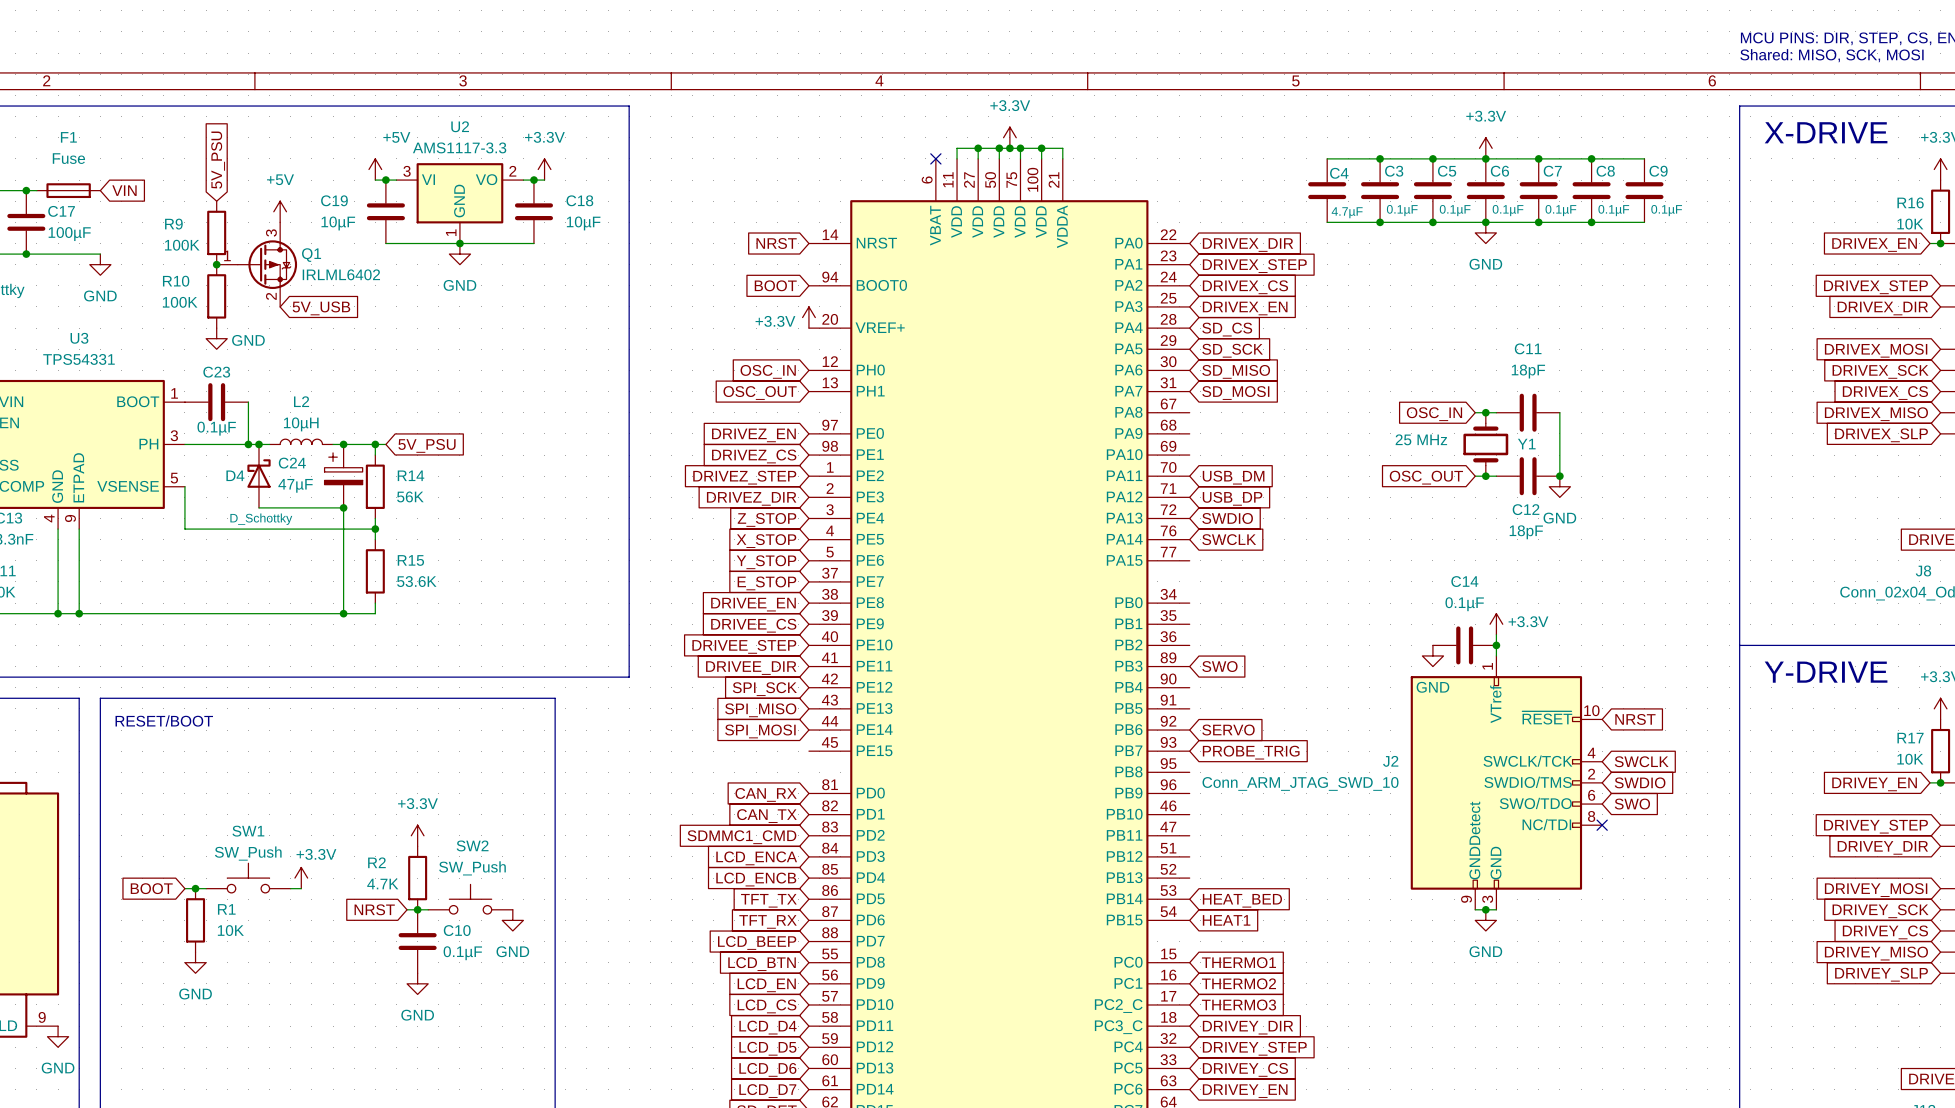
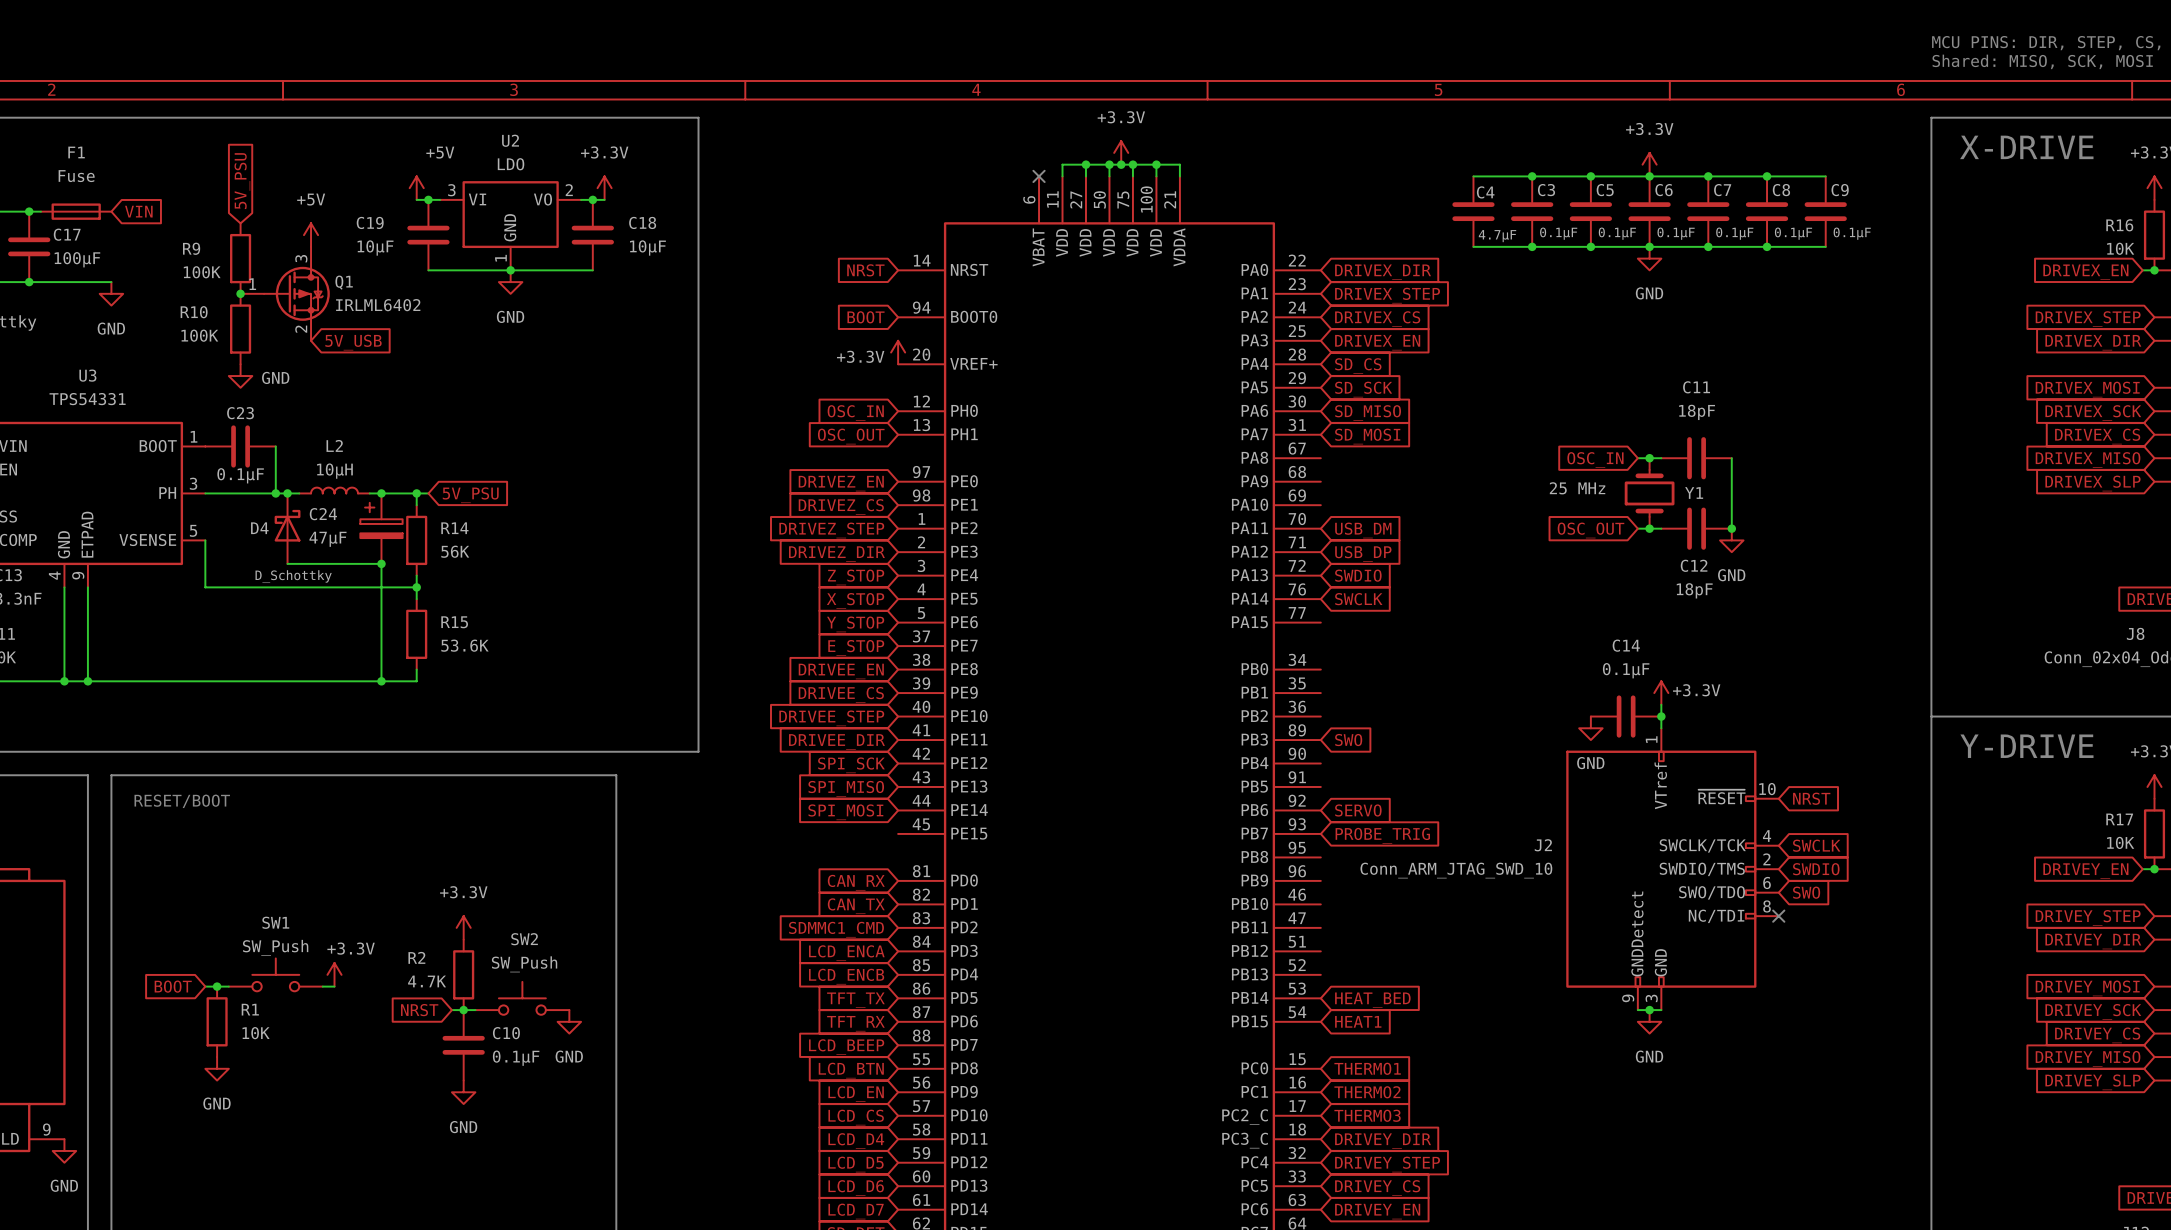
U2 value: AMS1117-3.3 (459, 147) -> LDO (511, 164)

